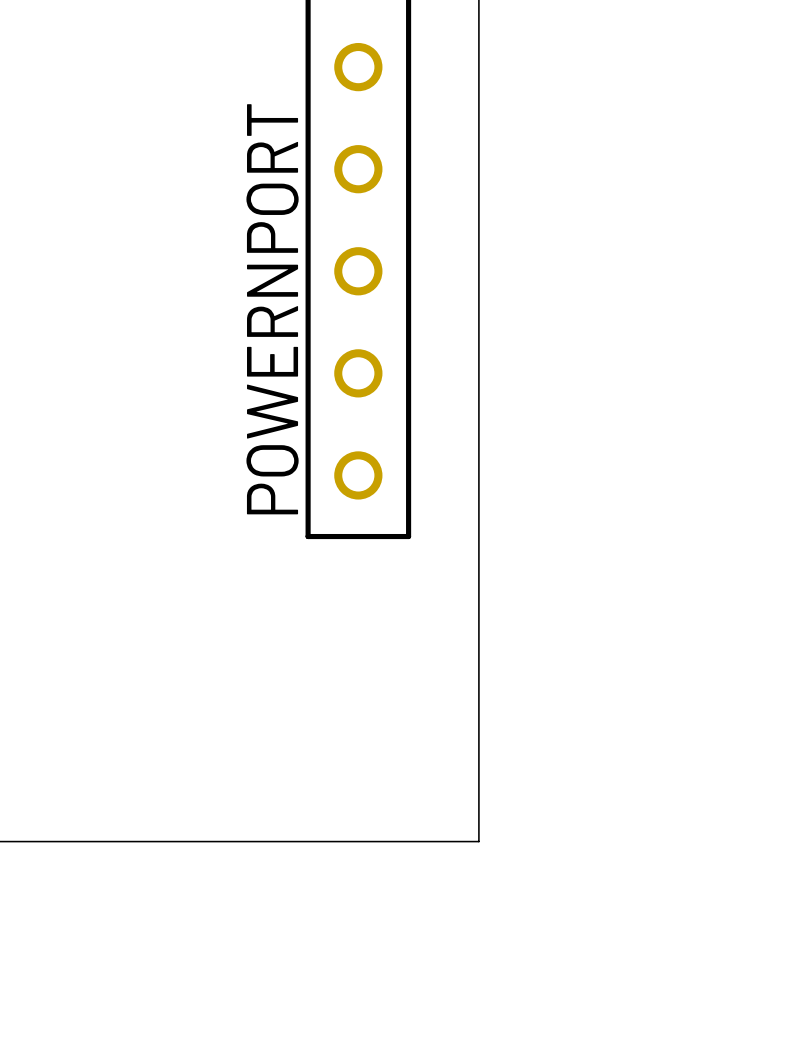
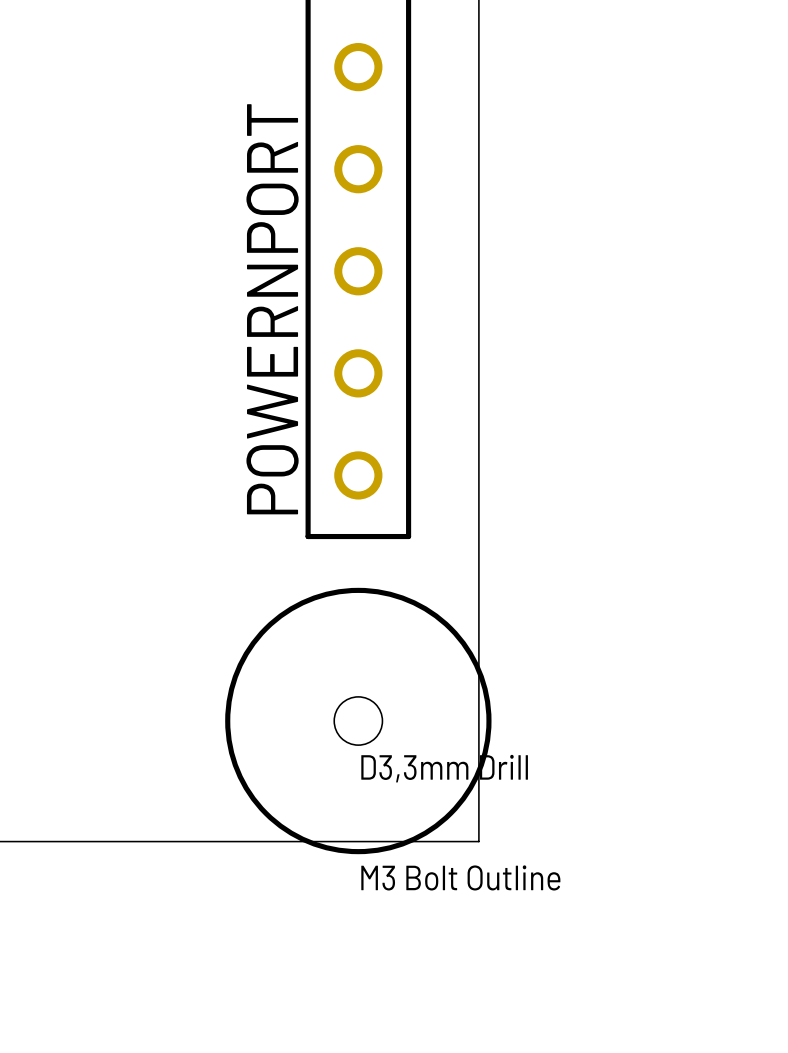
part: none -> (358, 721)

